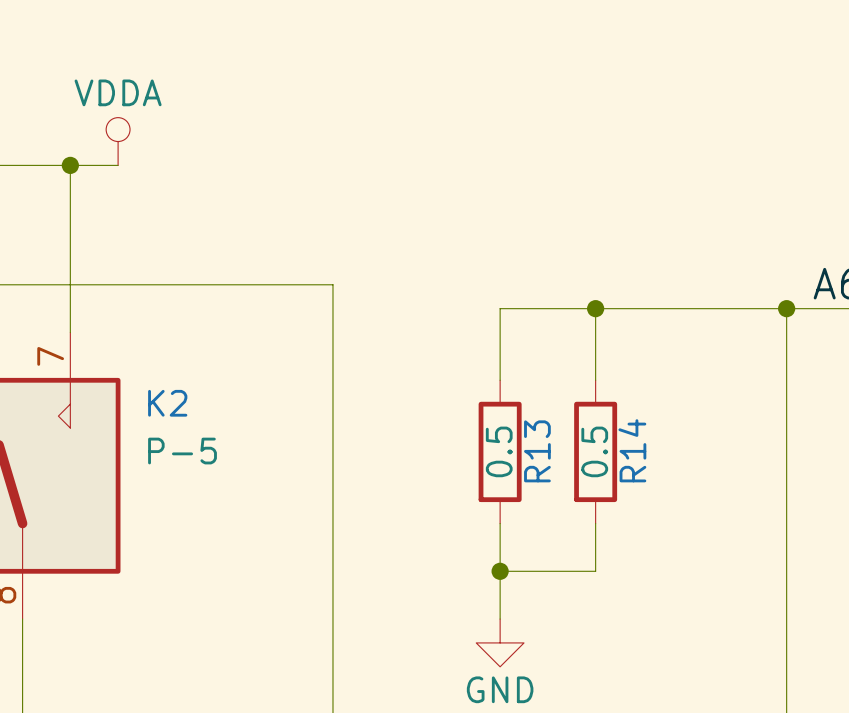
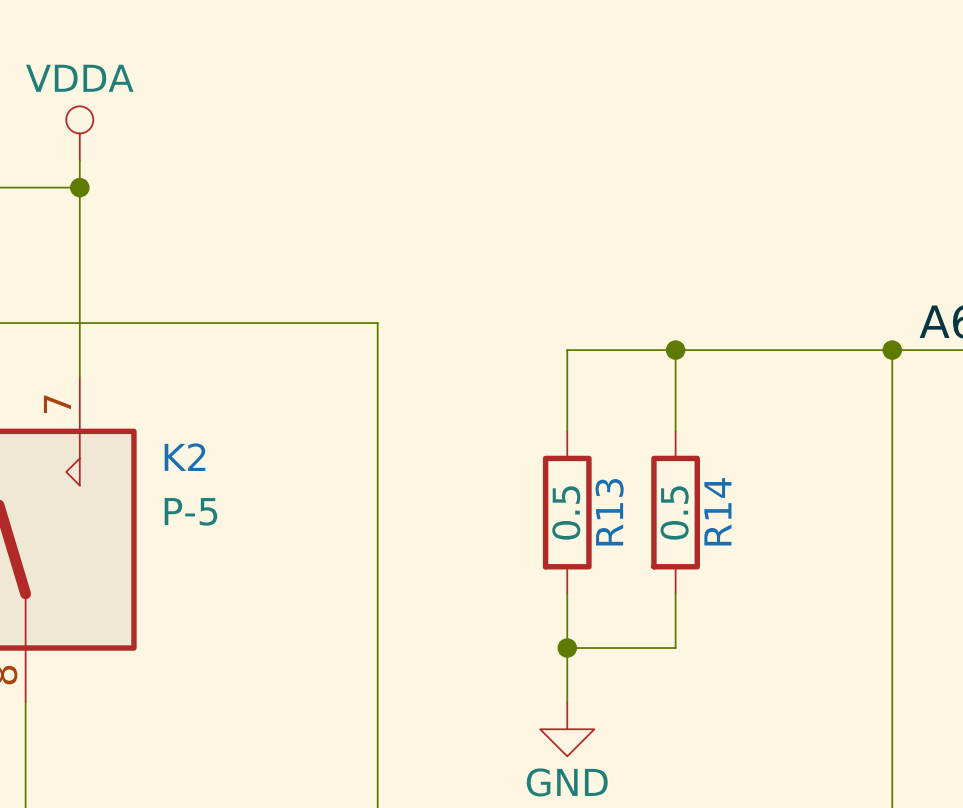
power symbol position: VDDA (118, 141) -> VDDA (79, 133)
wire: (70, 165) (118, 165) -> (79, 187) (79, 160)

